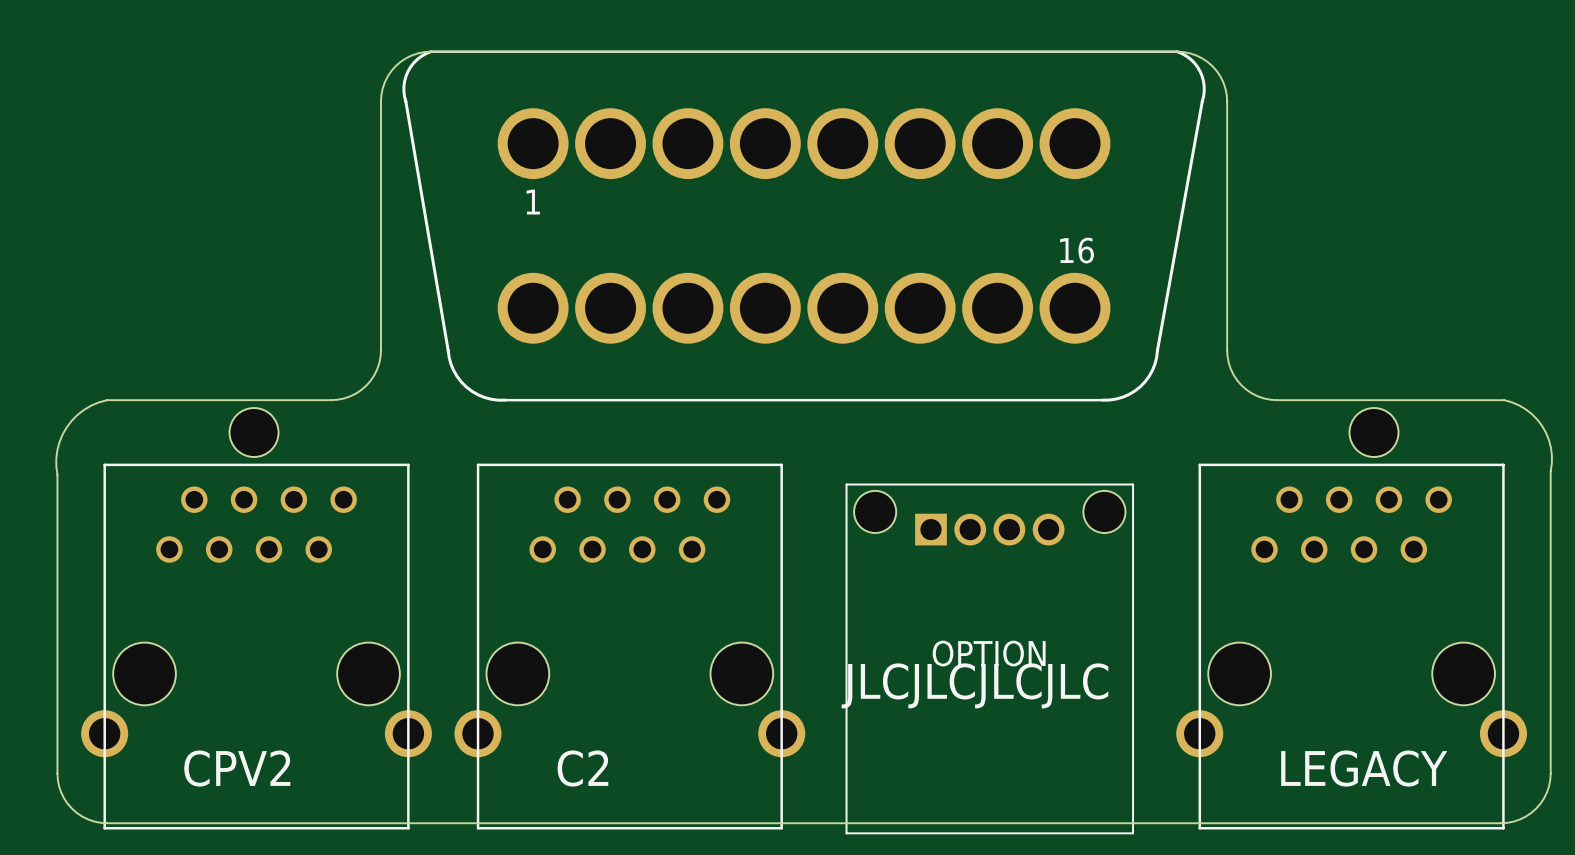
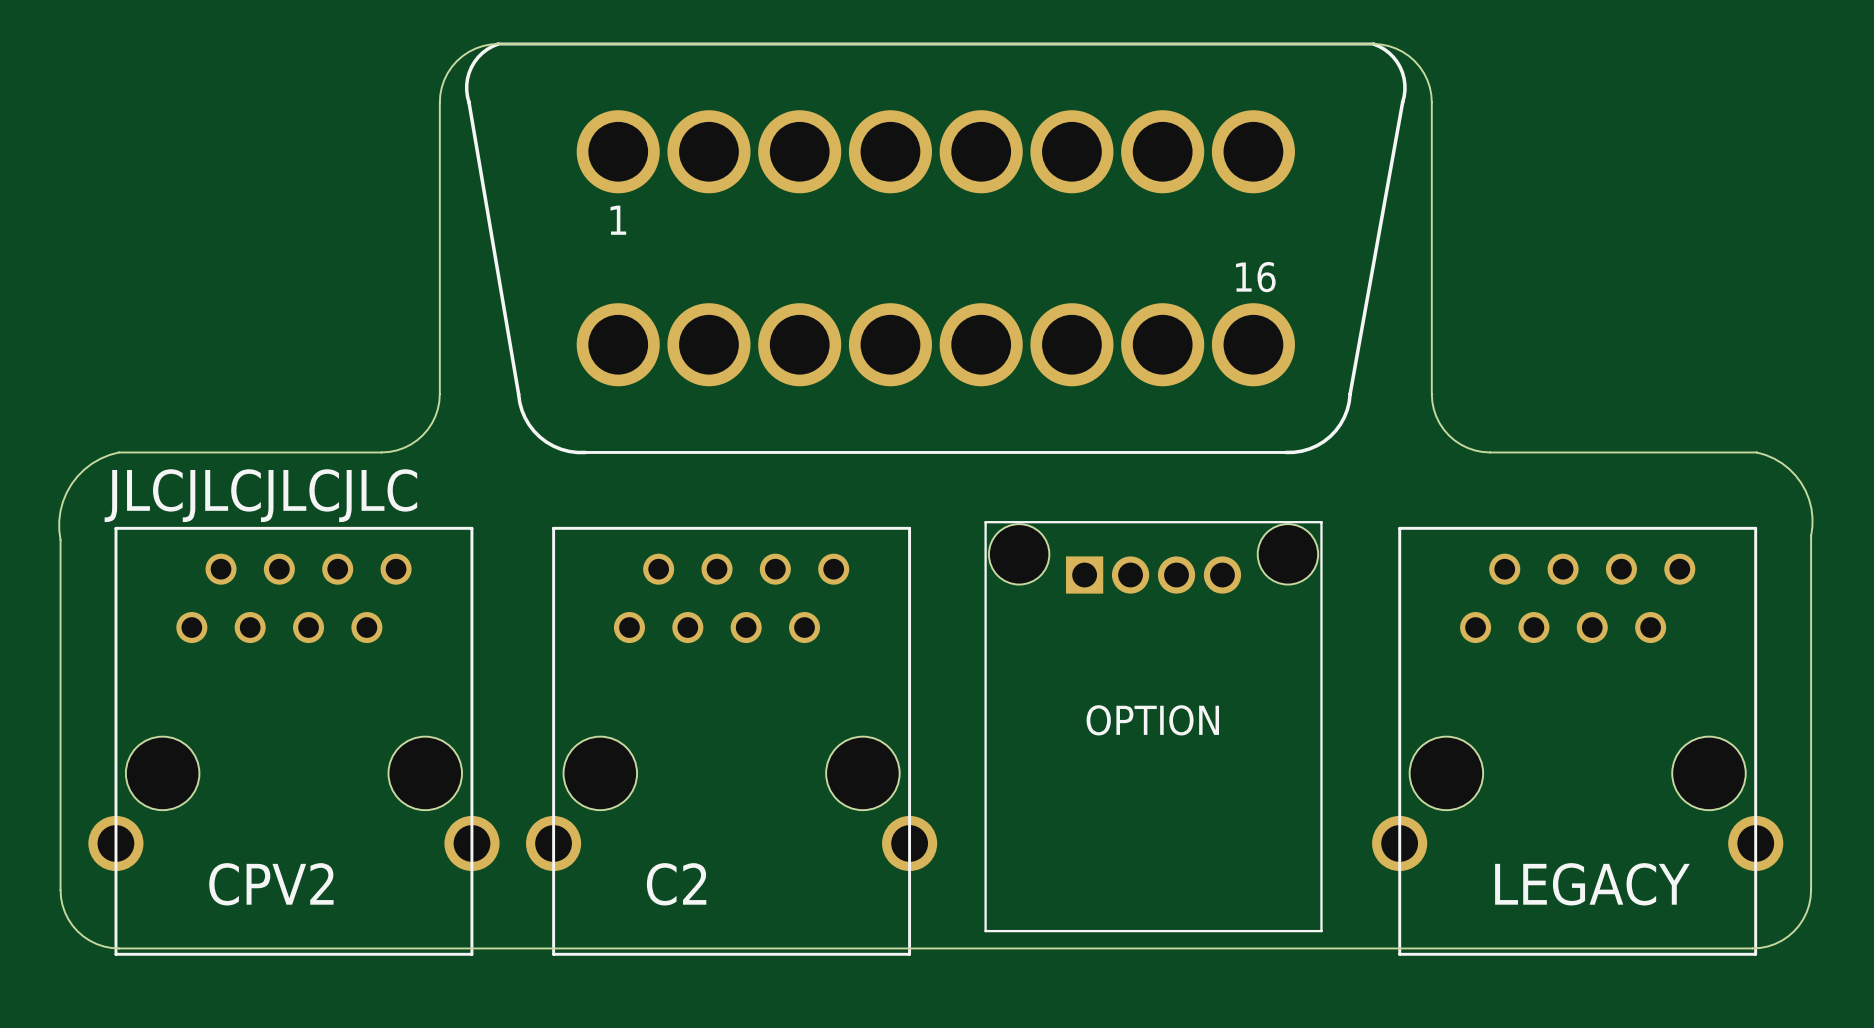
hole: (254, 432) -> none
hole: (1374, 432) -> none
text: none -> JLCJLCJLCJLC (260, 495)
OPTION: none -> (1153, 720)
OPTION: (989, 654) -> none
text: JLCJLCJLCJLC (974, 685) -> none

